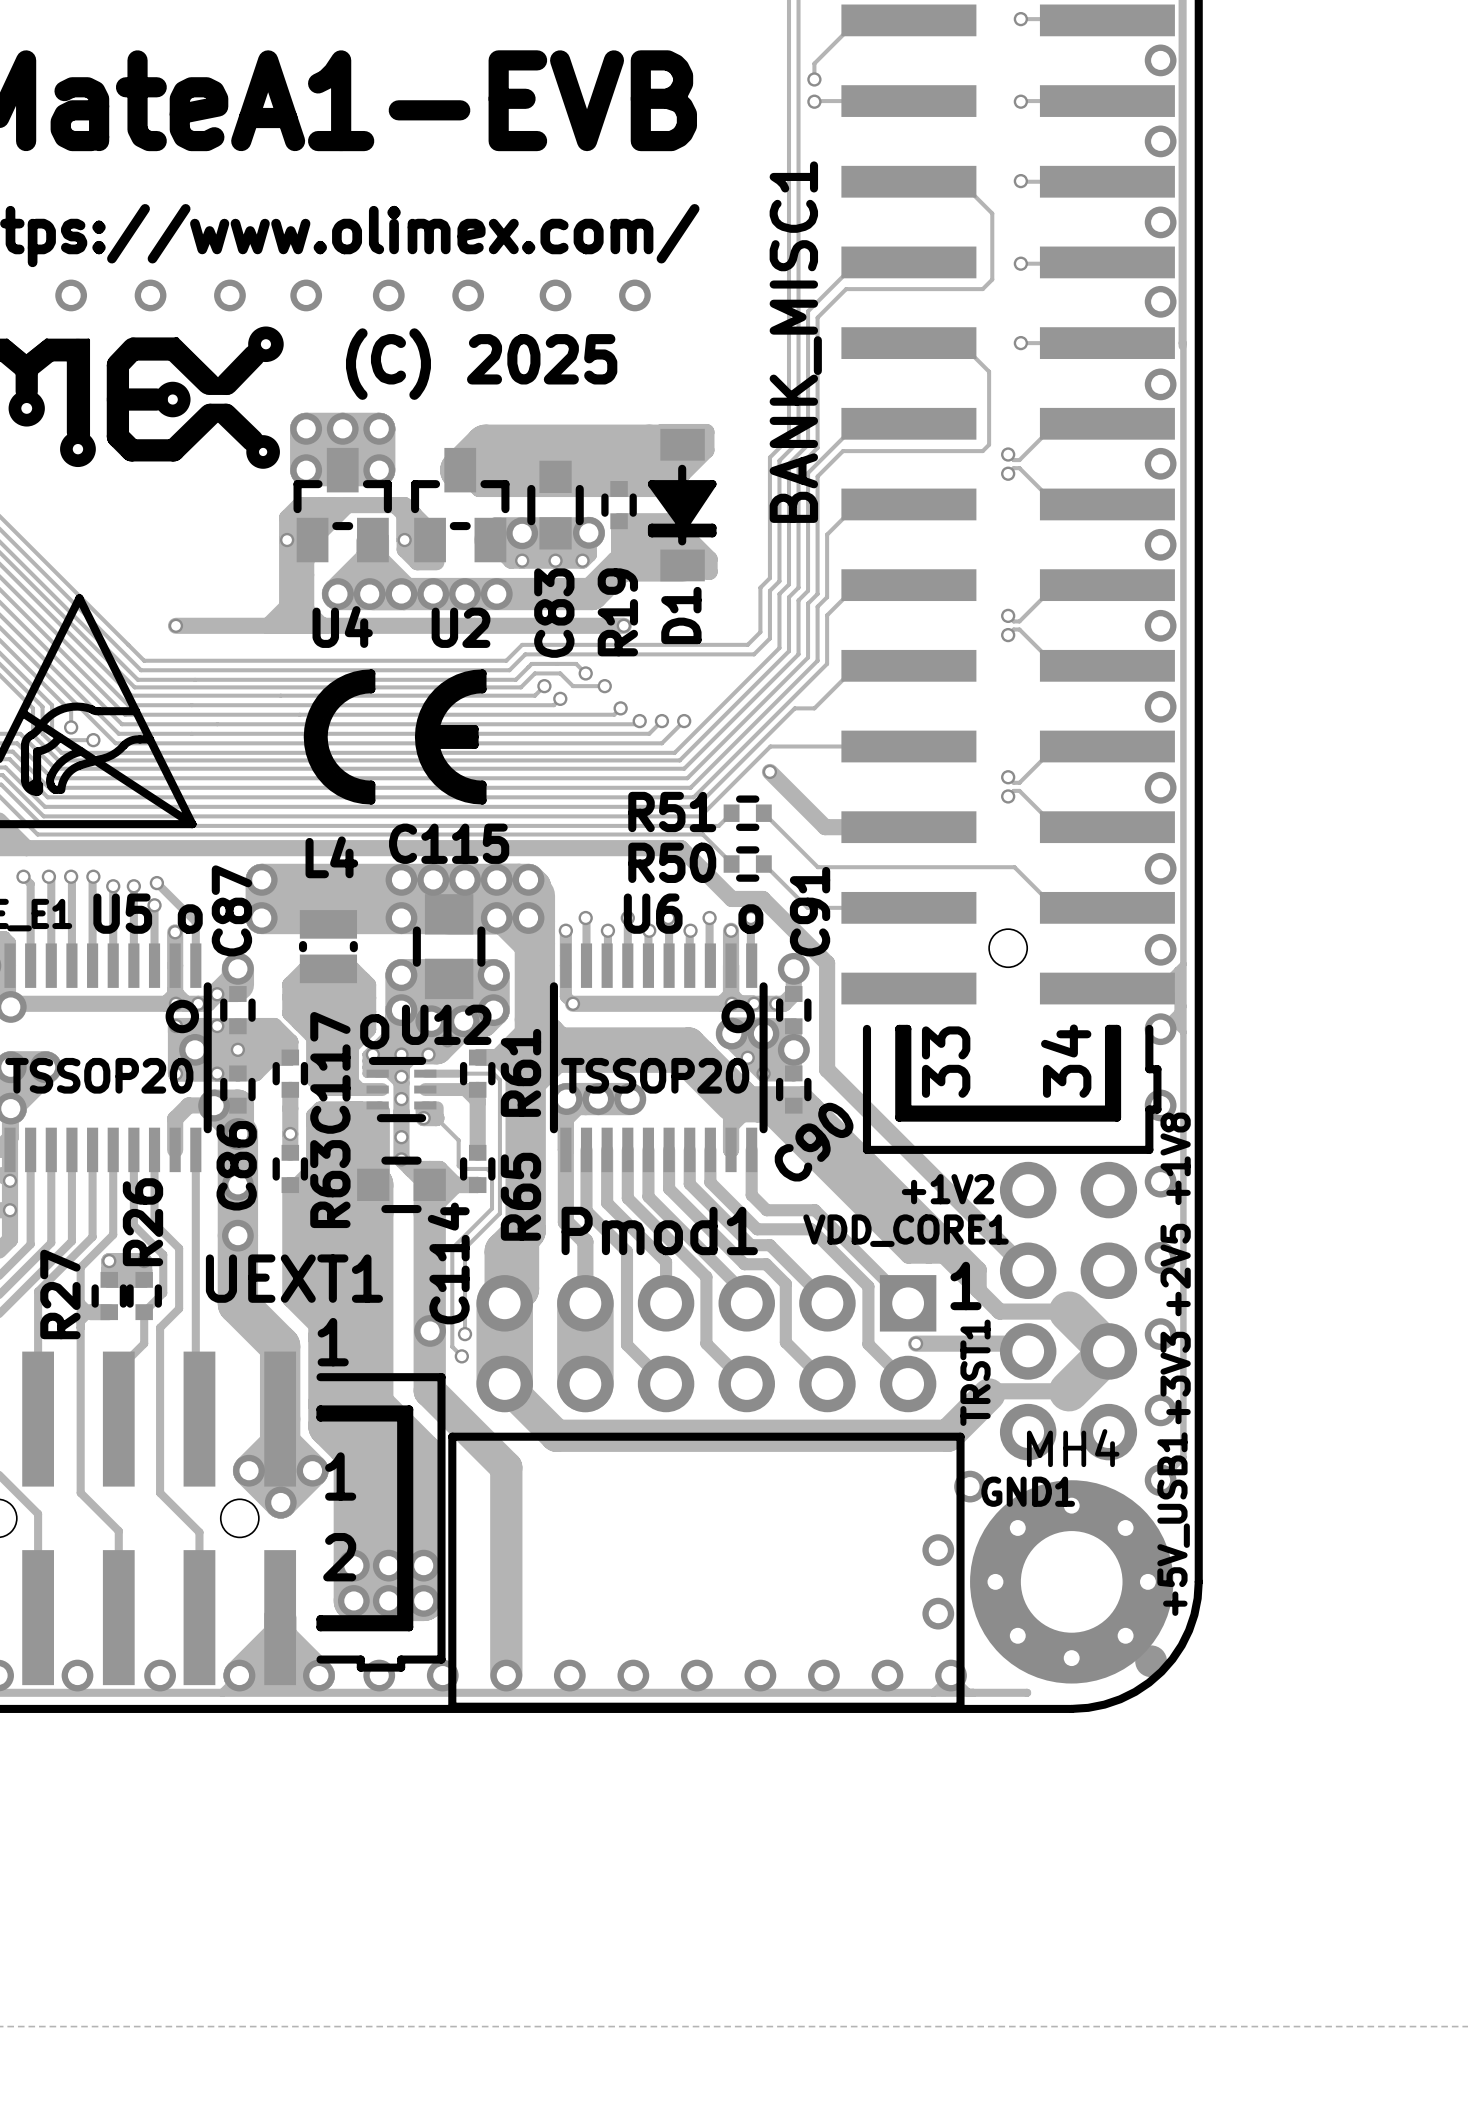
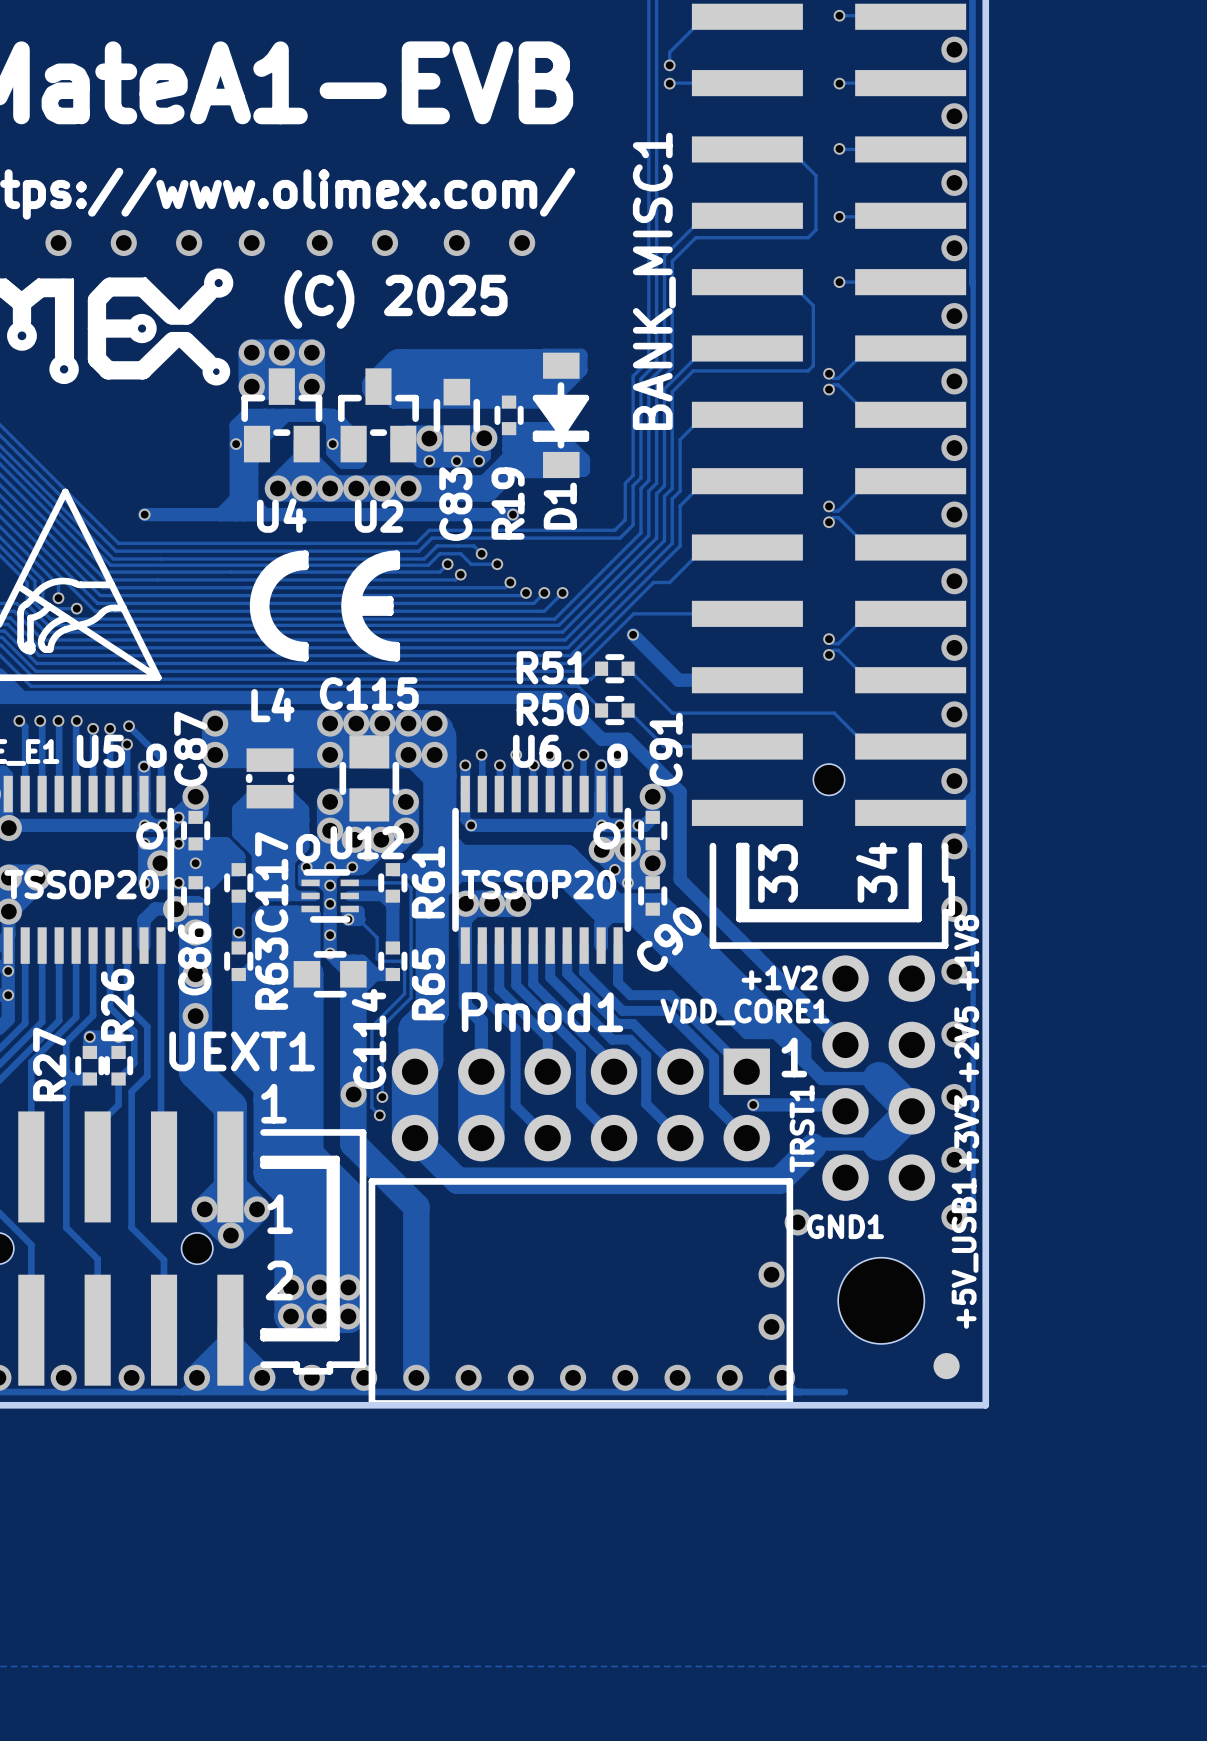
MH4: (1071, 1581) -> none
part: none -> (881, 1300)
board edge: (1198, 1581) (1197, 1598) (1189, 1630) (1181, 1645) (1161, 1671) (1149, 1682) (1120, 1699) (1104, 1704) (1071, 1708) -> (985, 1300) (985, 1405) (881, 1405)

